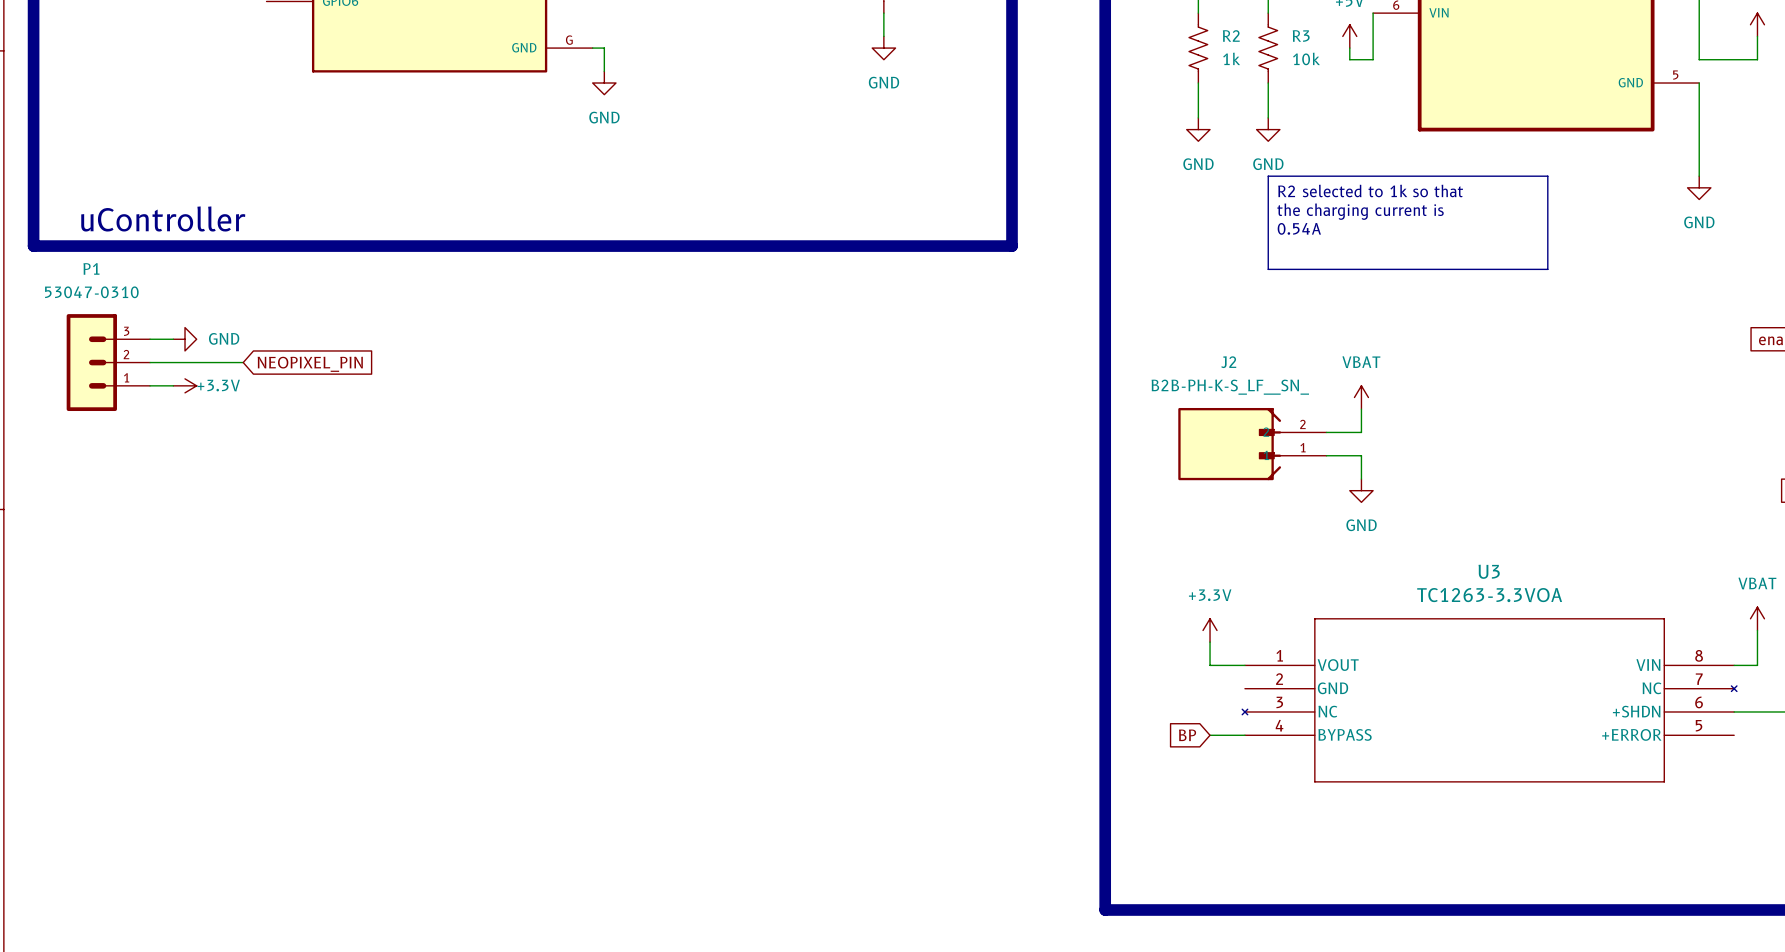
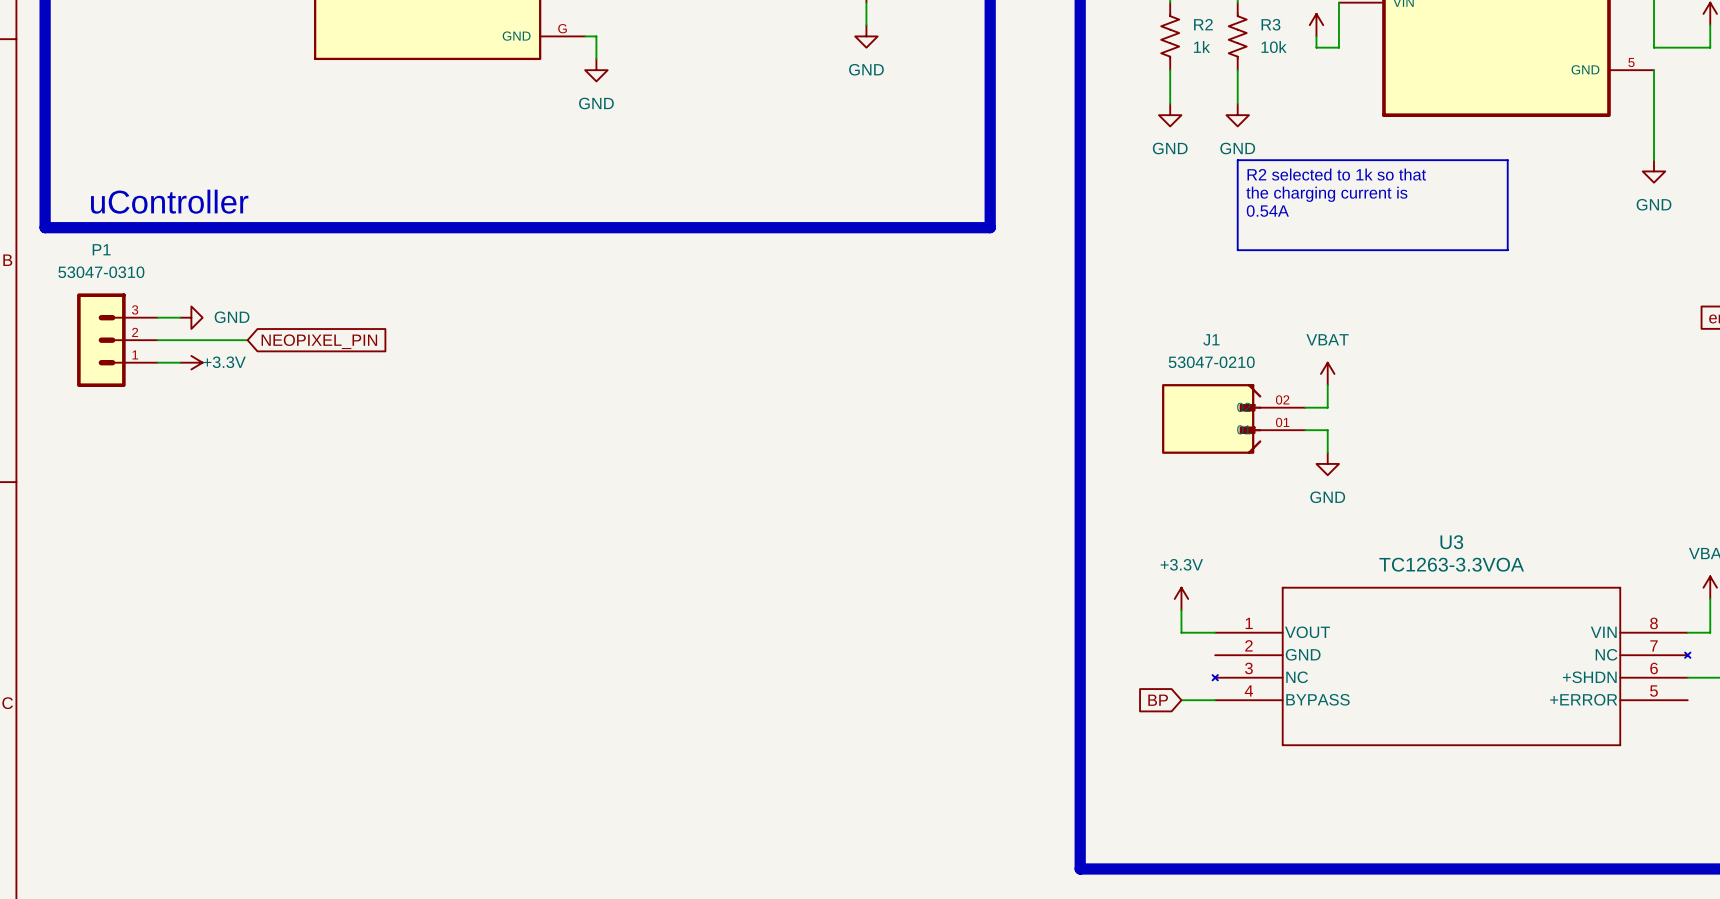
J2: B2B-PH-K-S_LF__SN_ (1252, 444) -> none
J1: none -> 53047-0210 (1233, 418)

